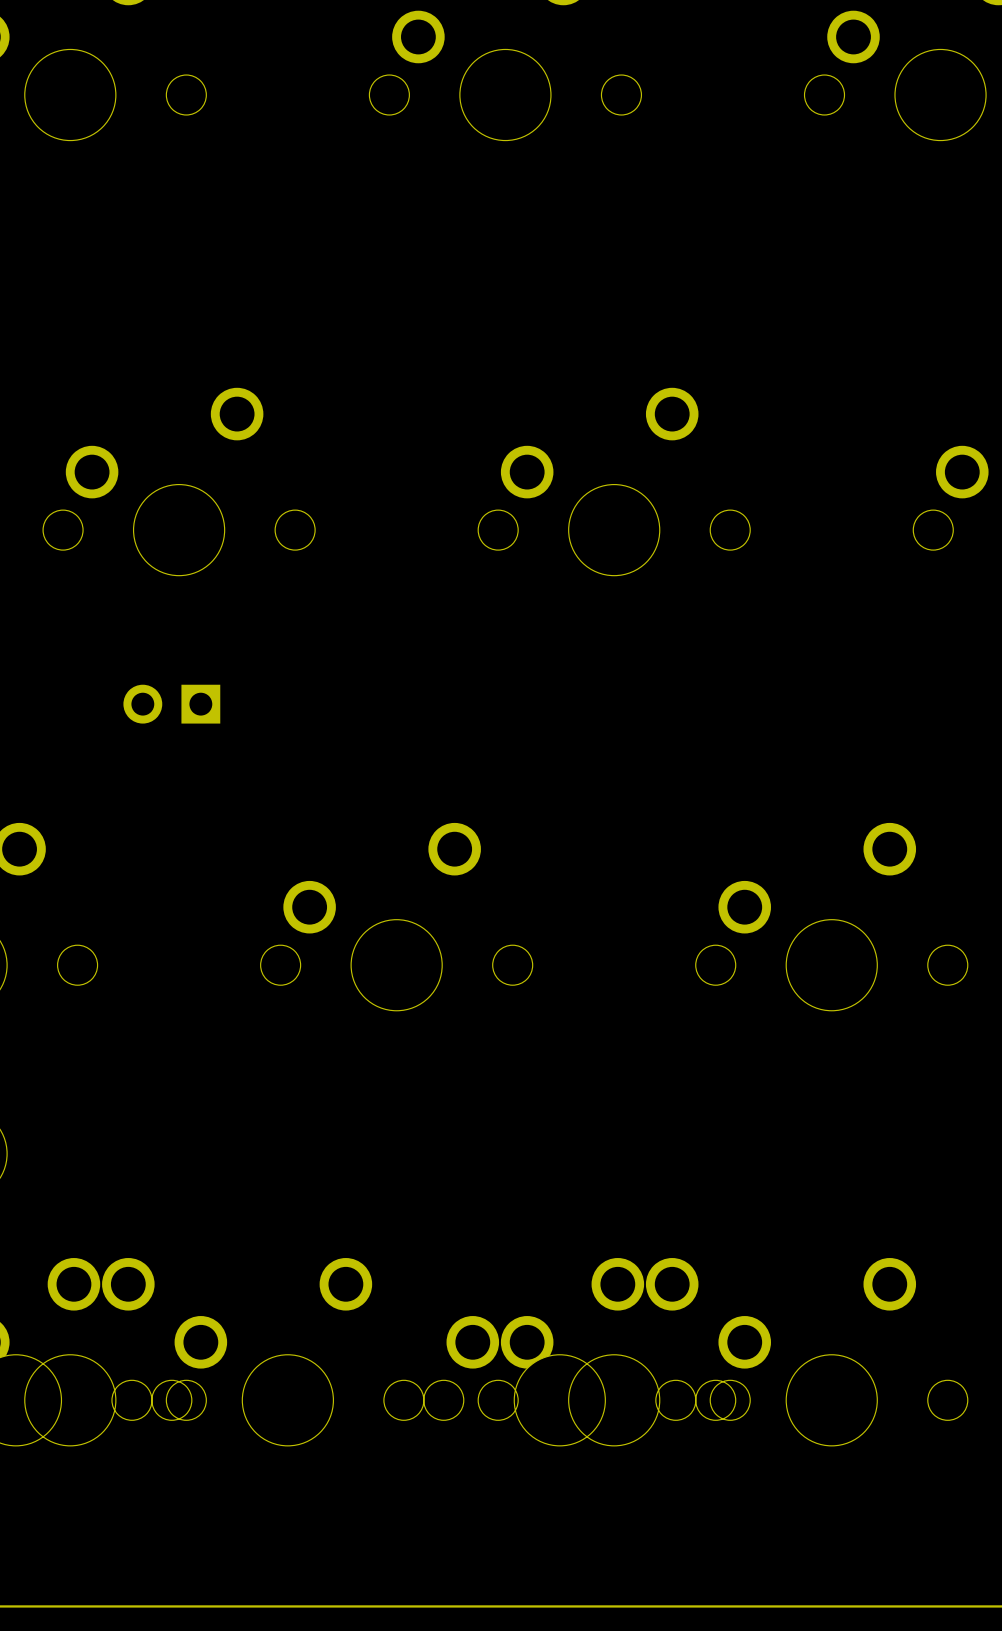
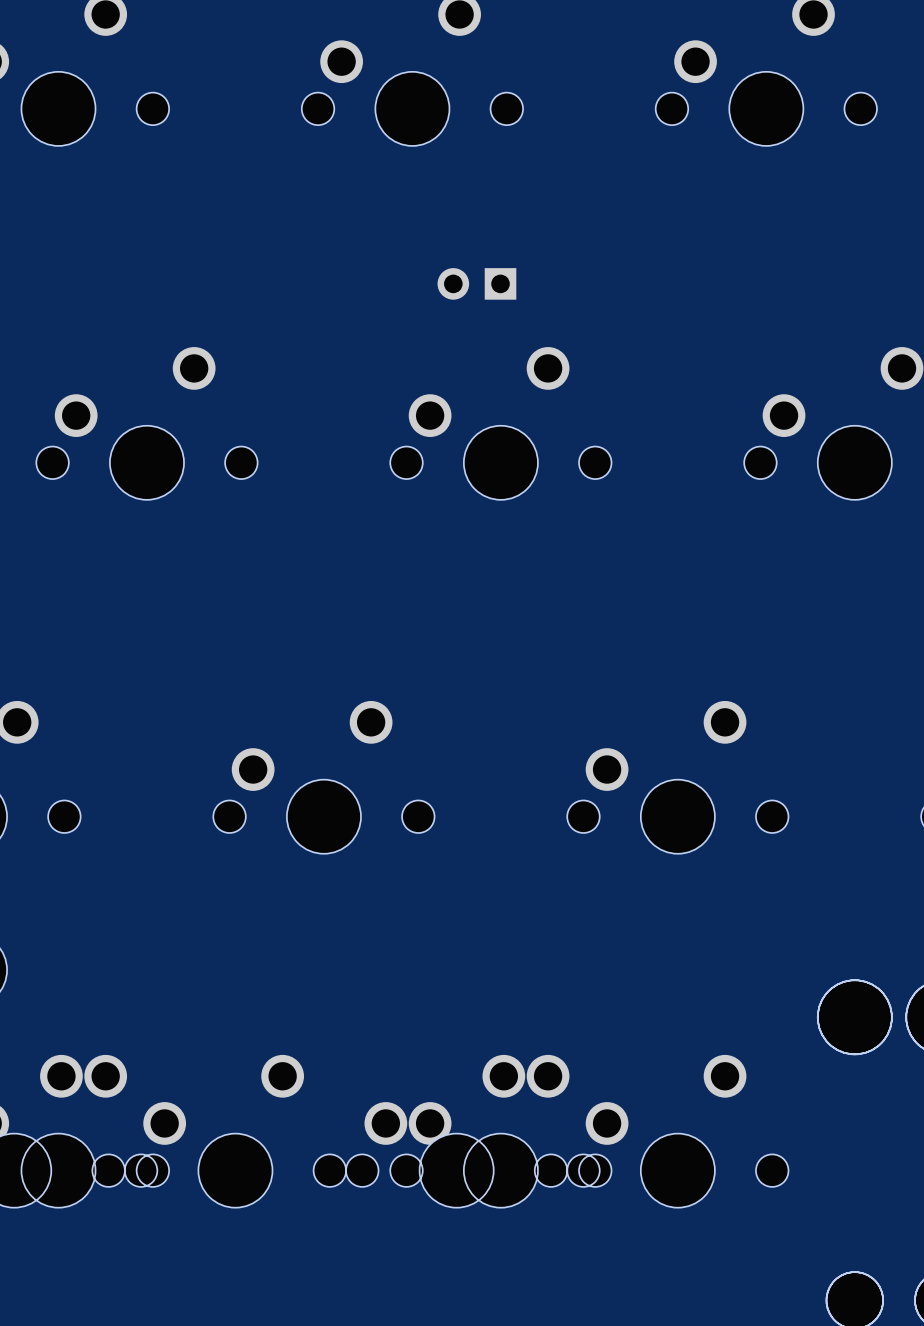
part position: (171, 704) -> (476, 283)

